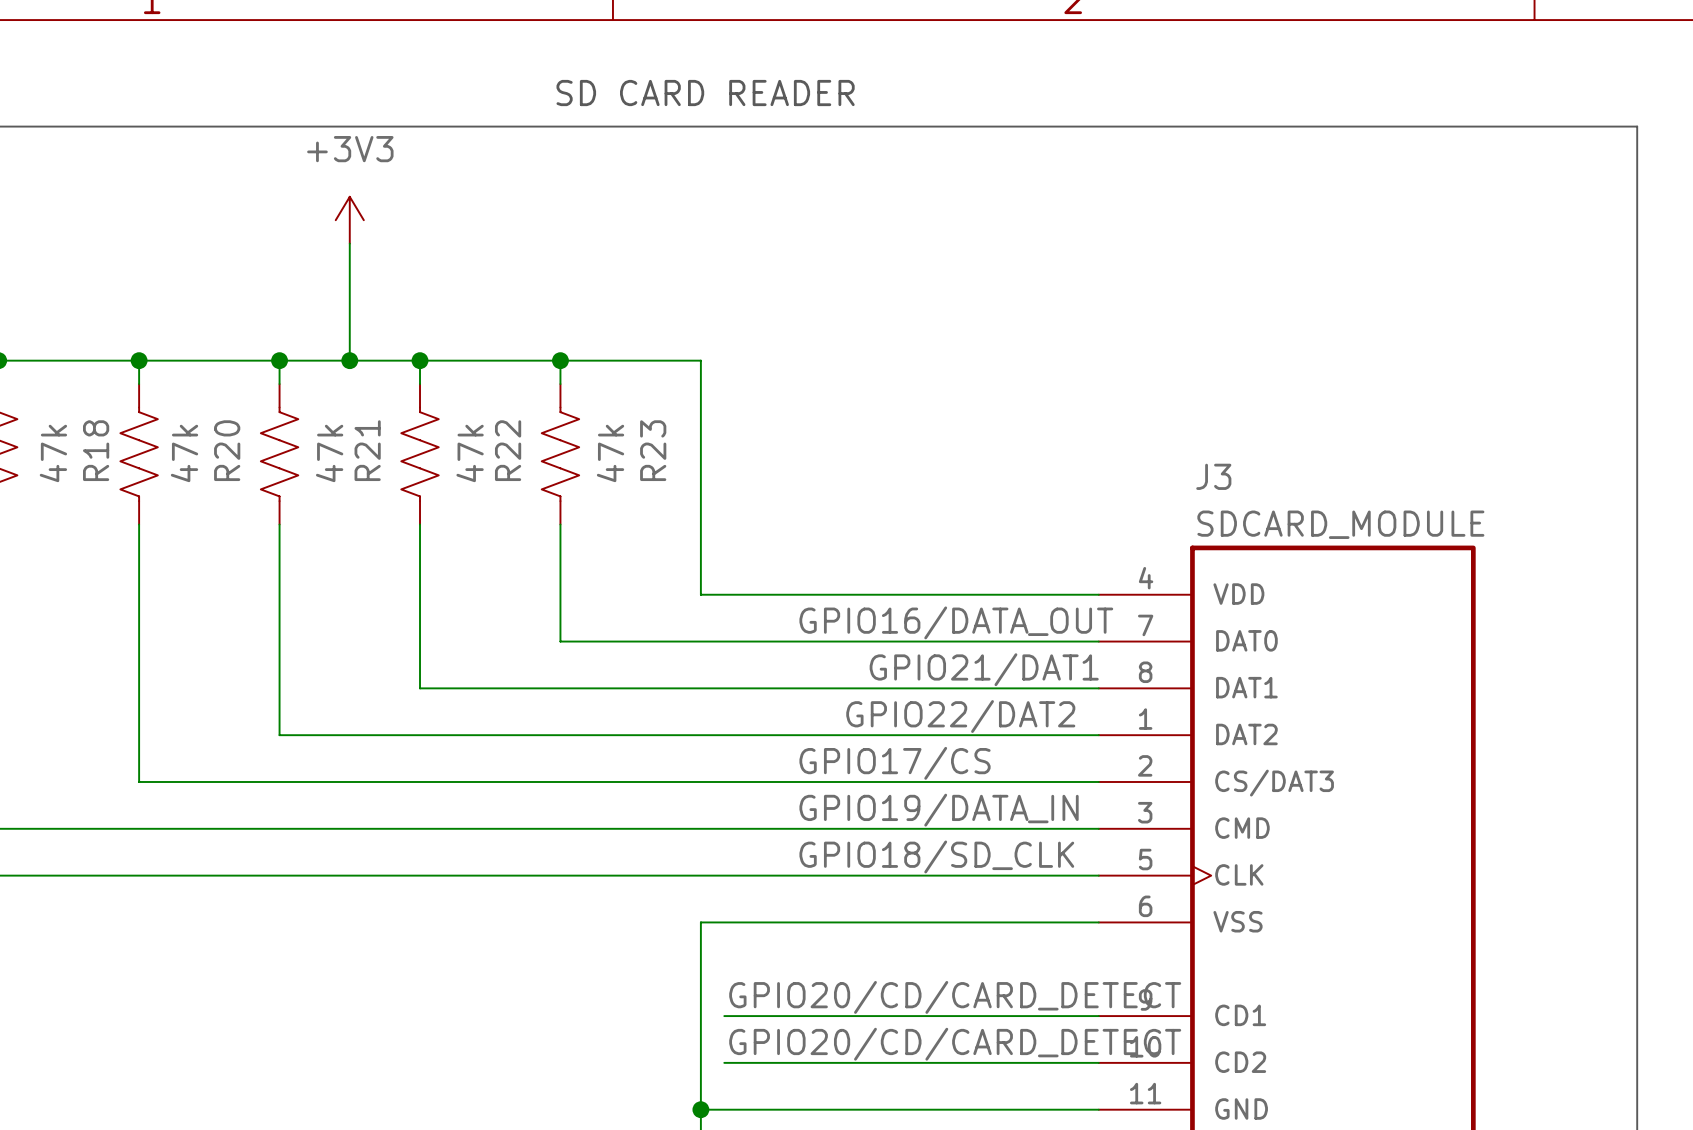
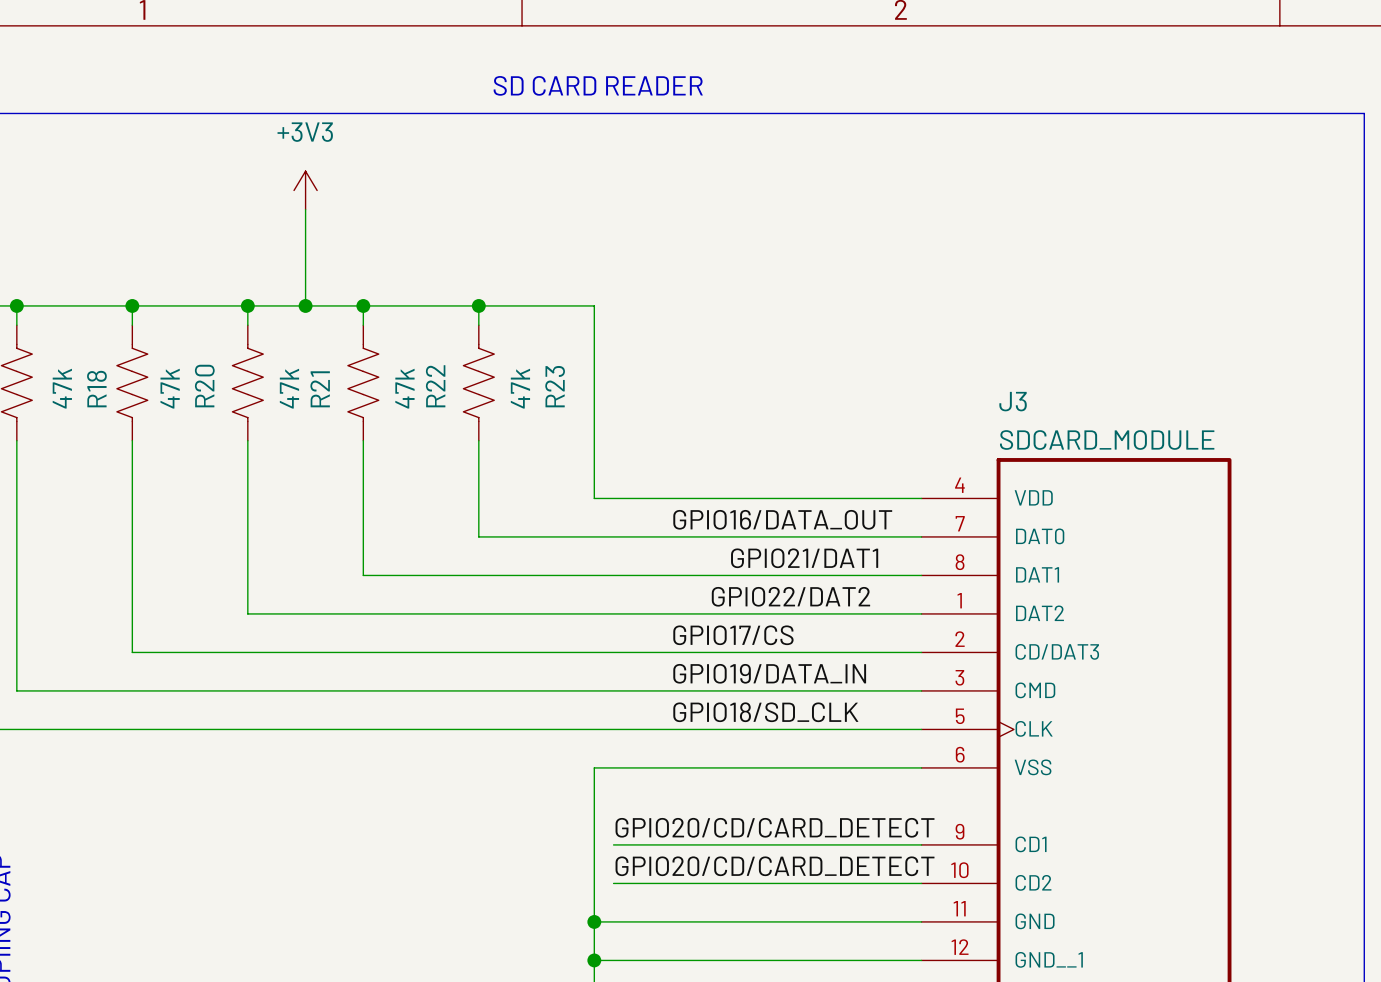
J3 pin name: CS/DAT3 (1274, 783) -> CD/DAT3 (1057, 651)

